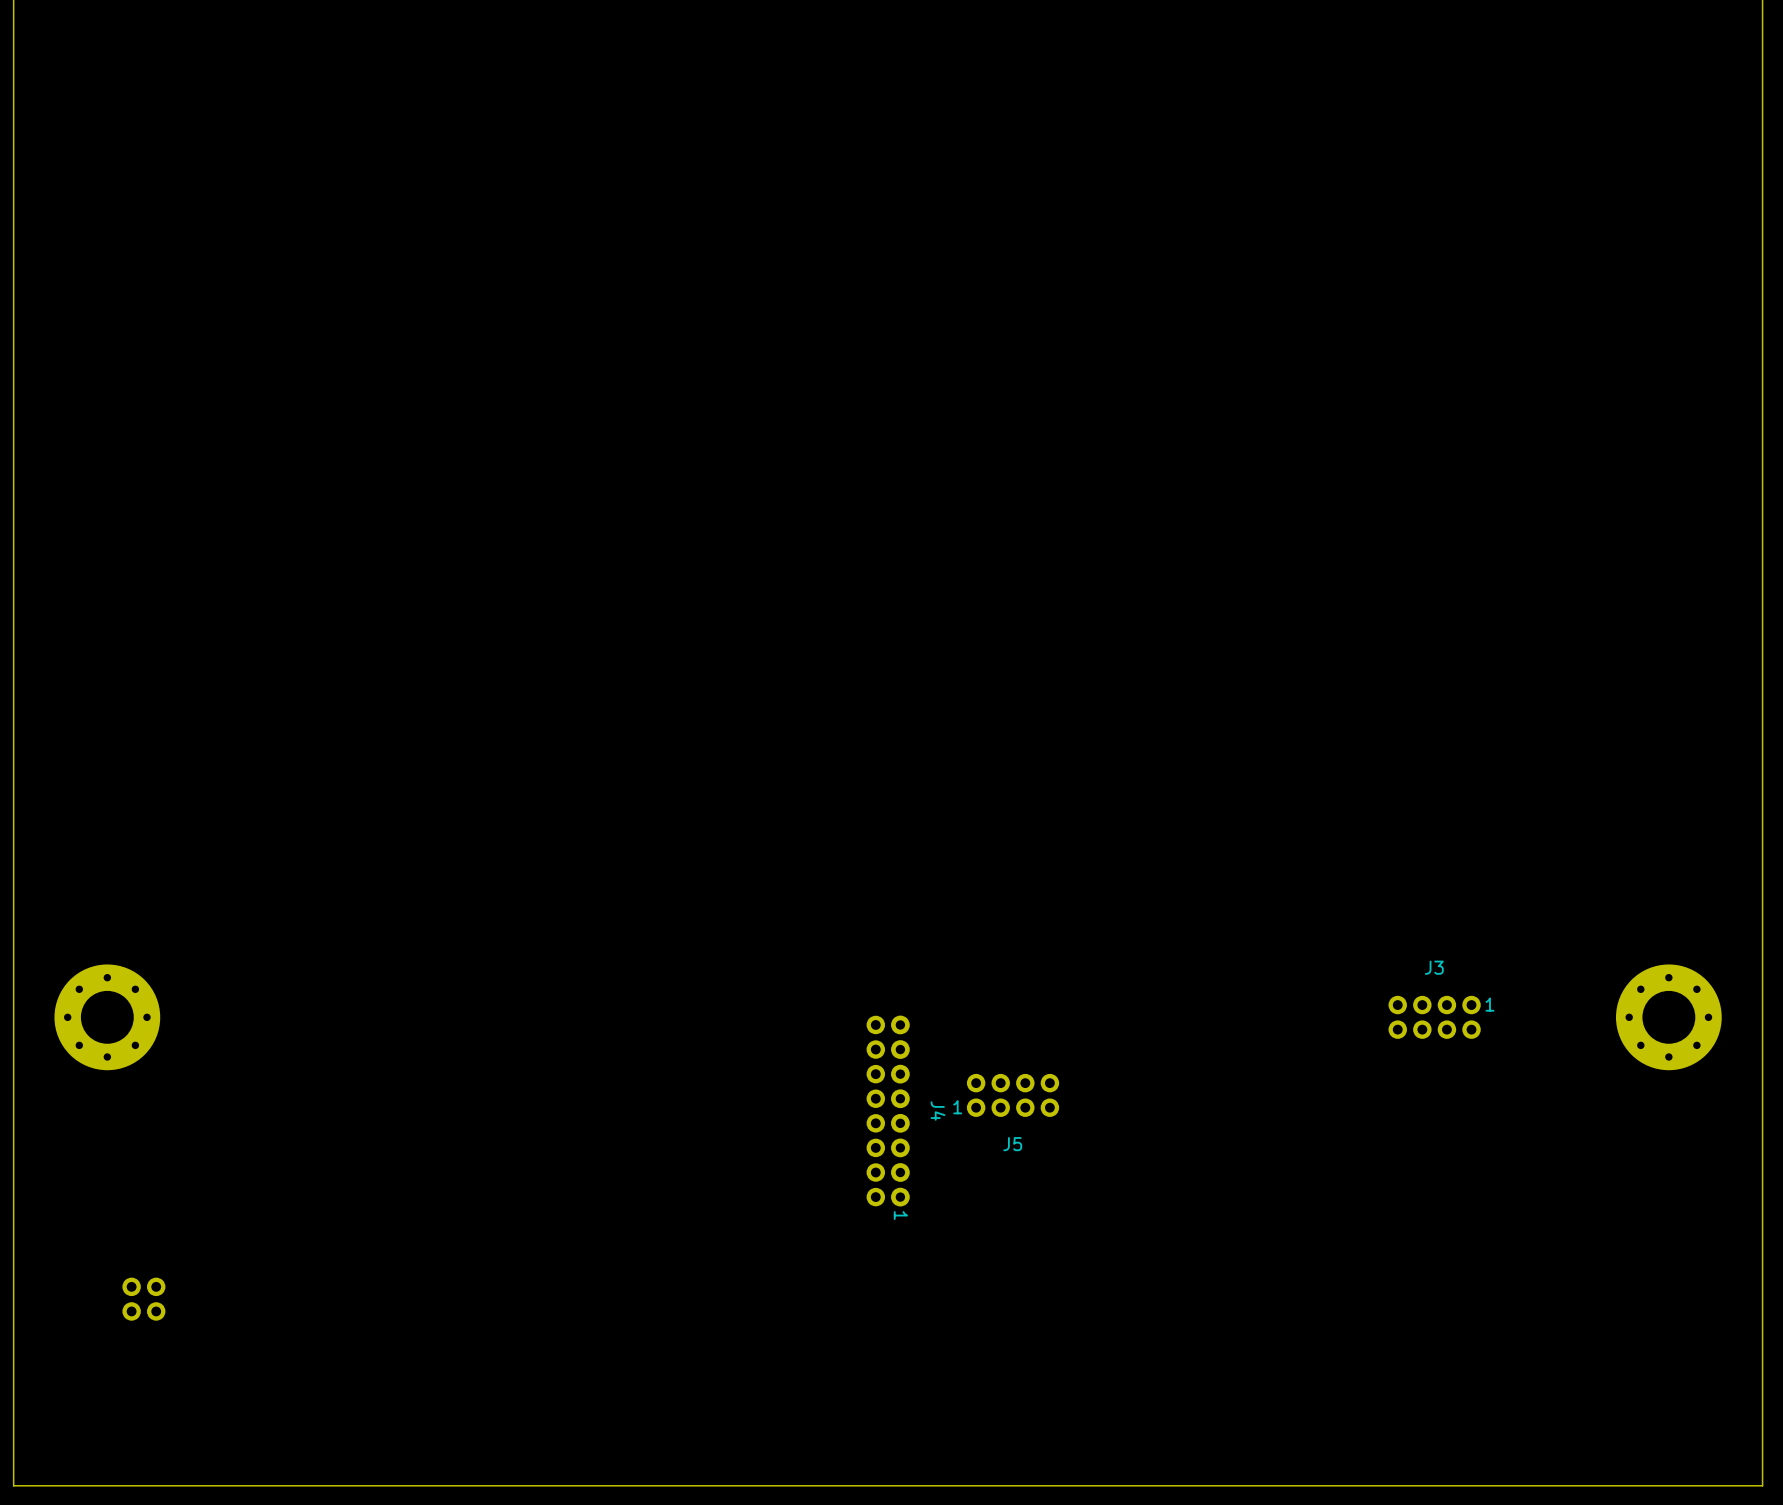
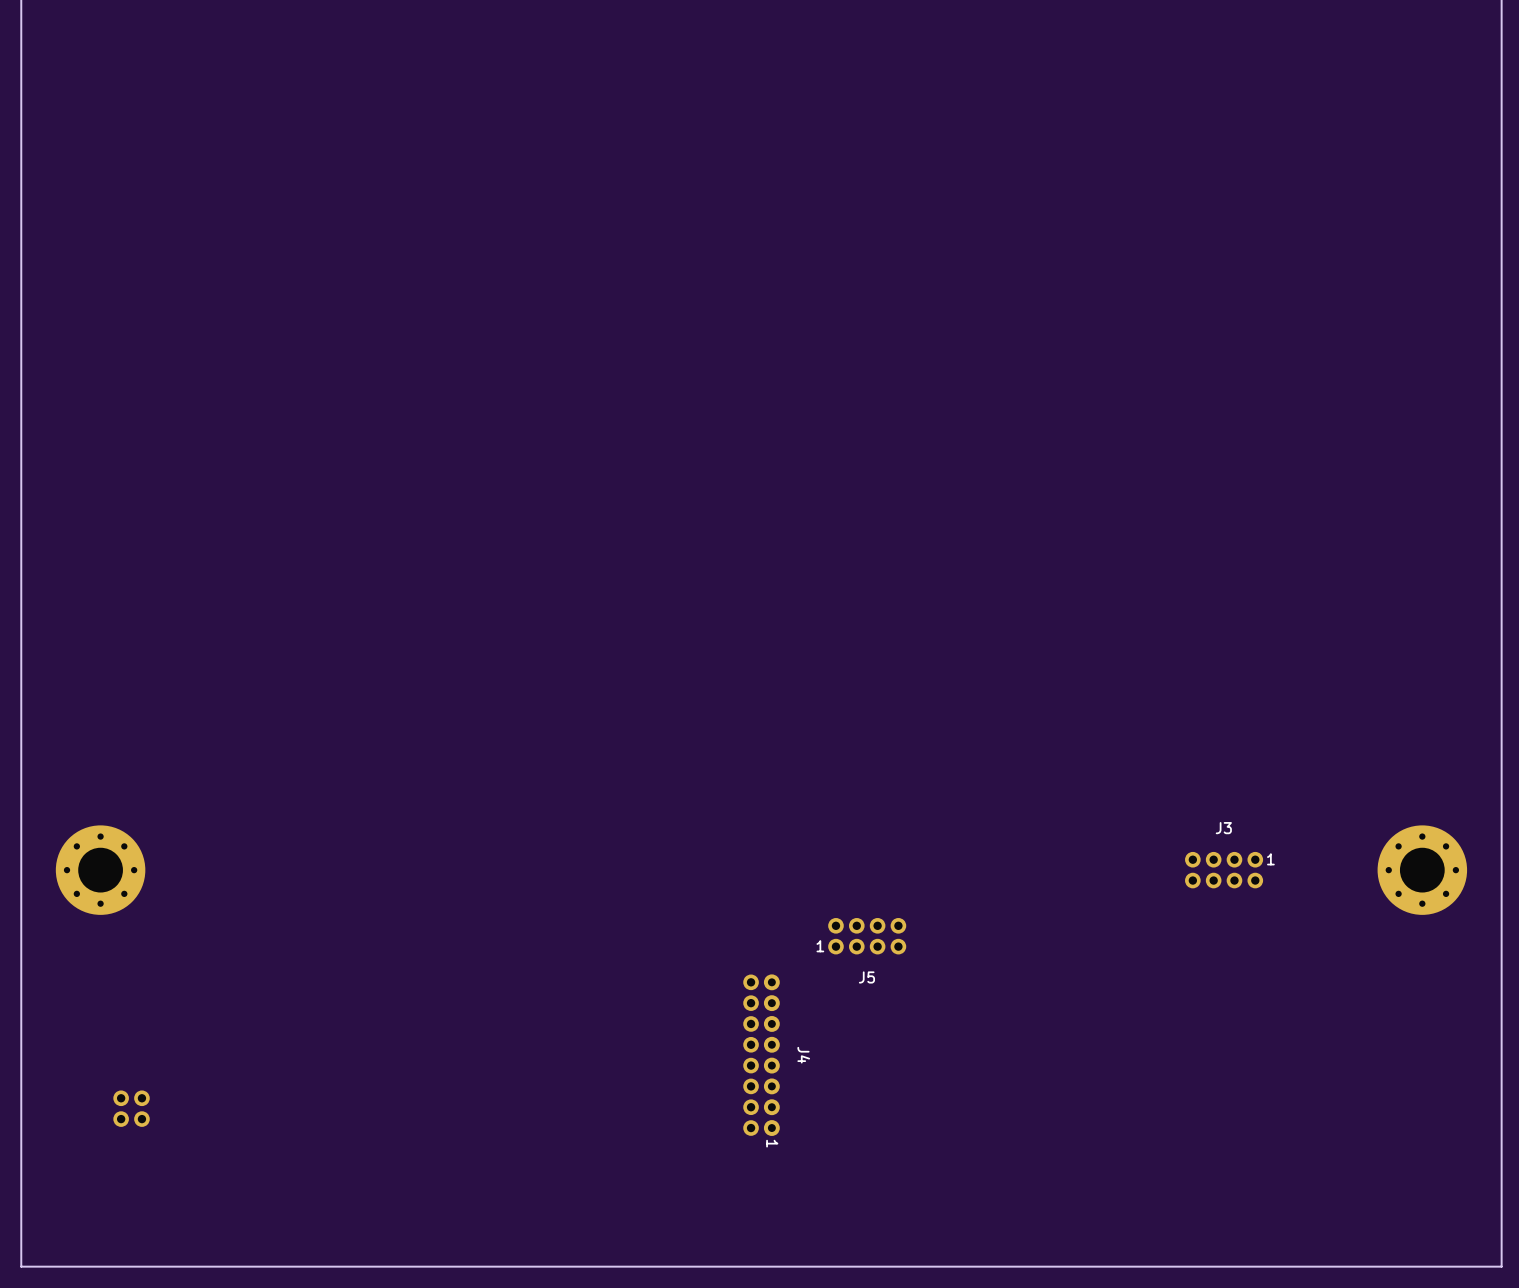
J4 position: (888, 1111) -> (761, 1055)

